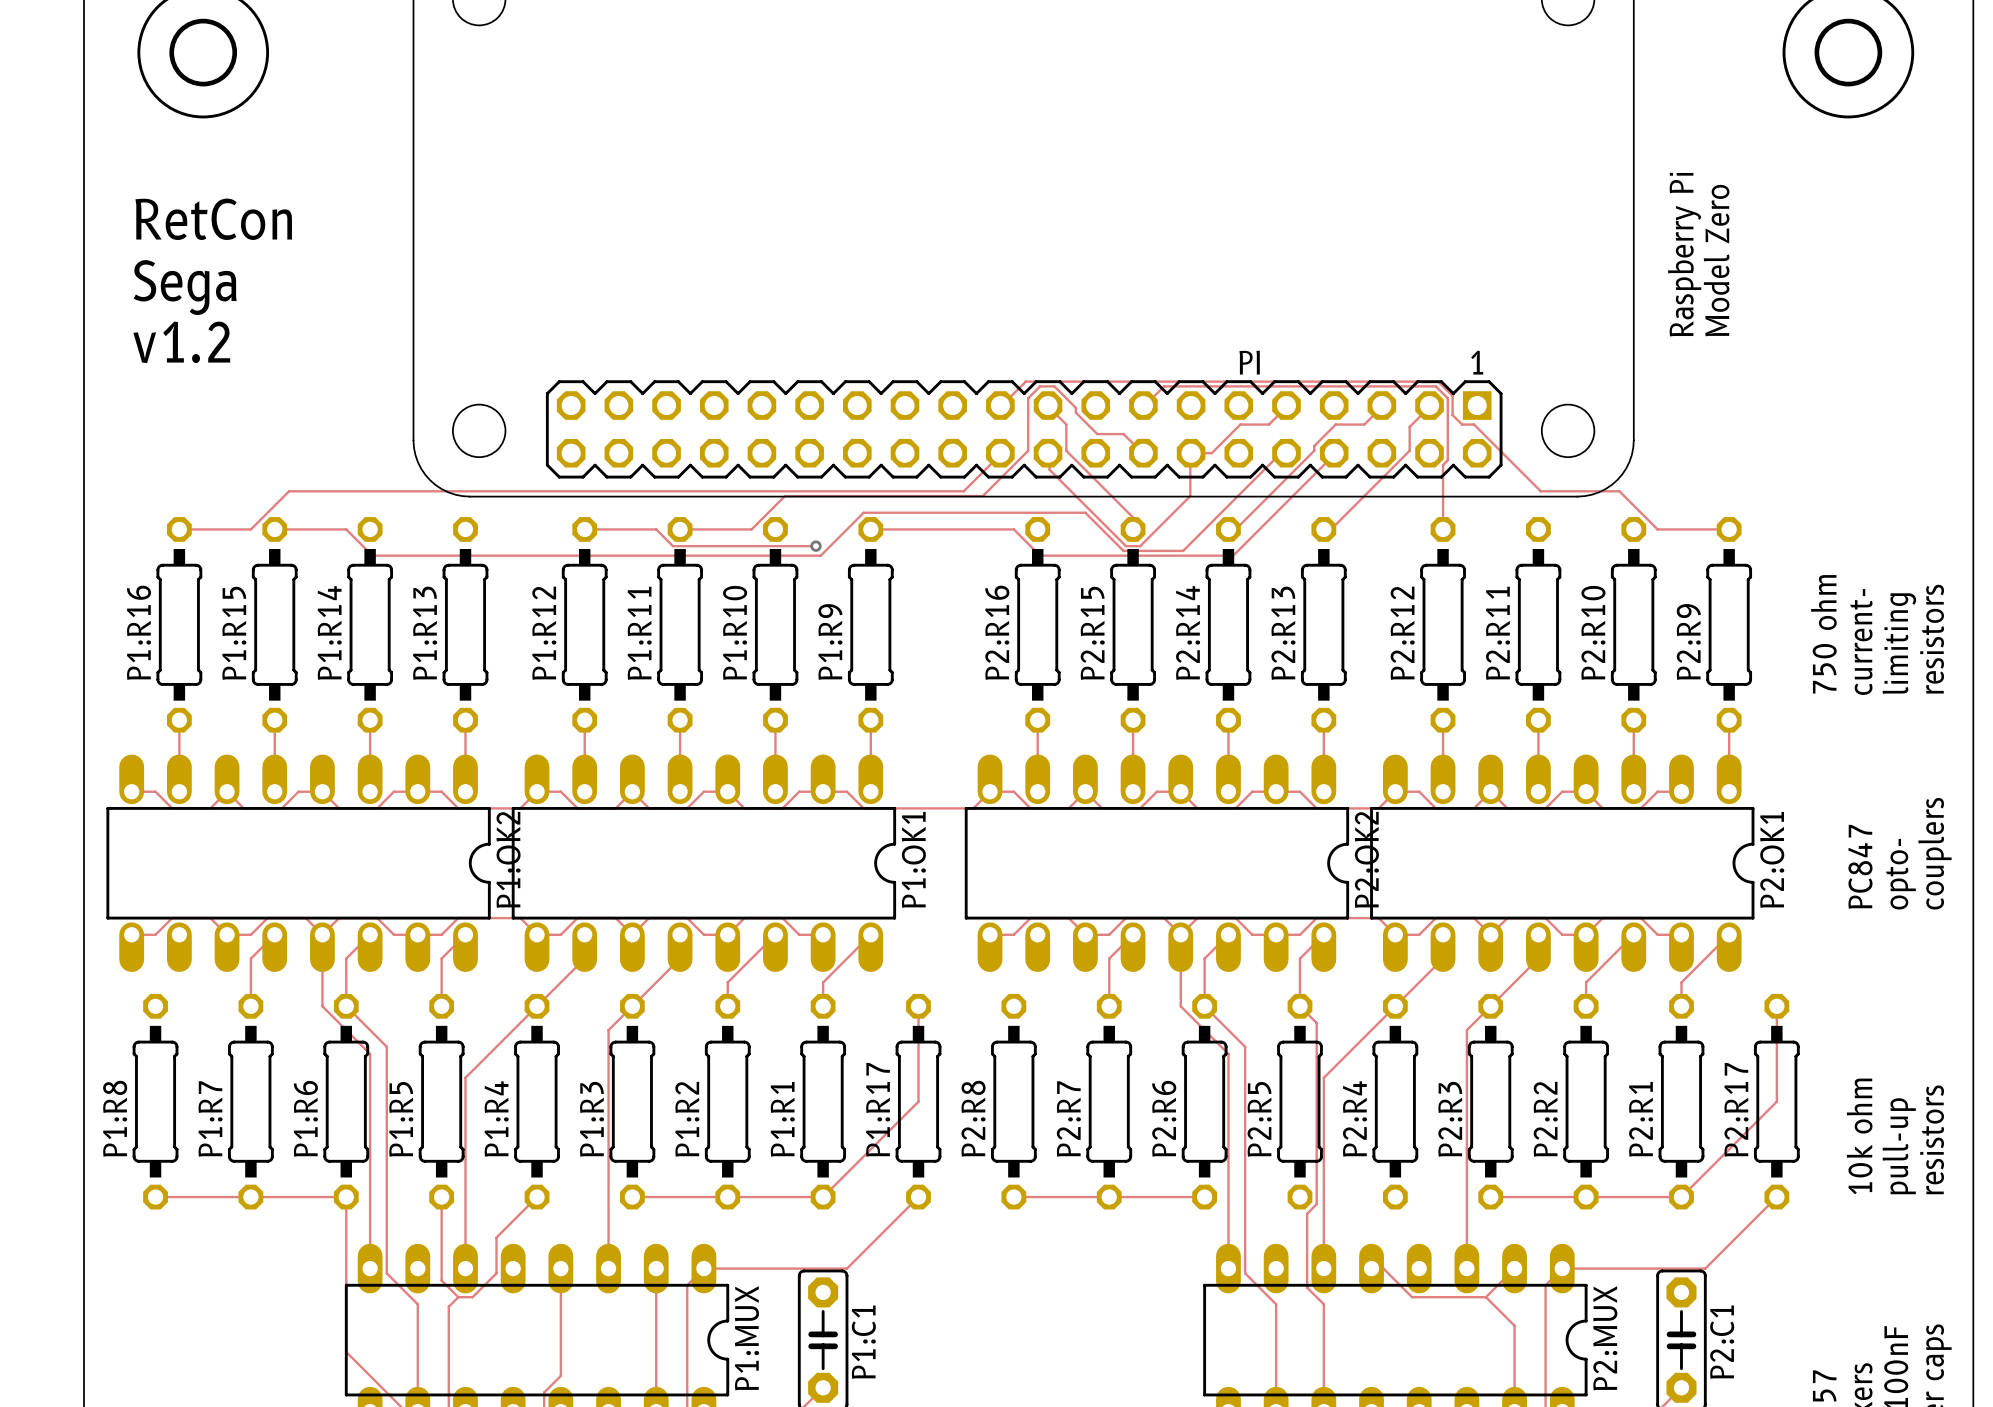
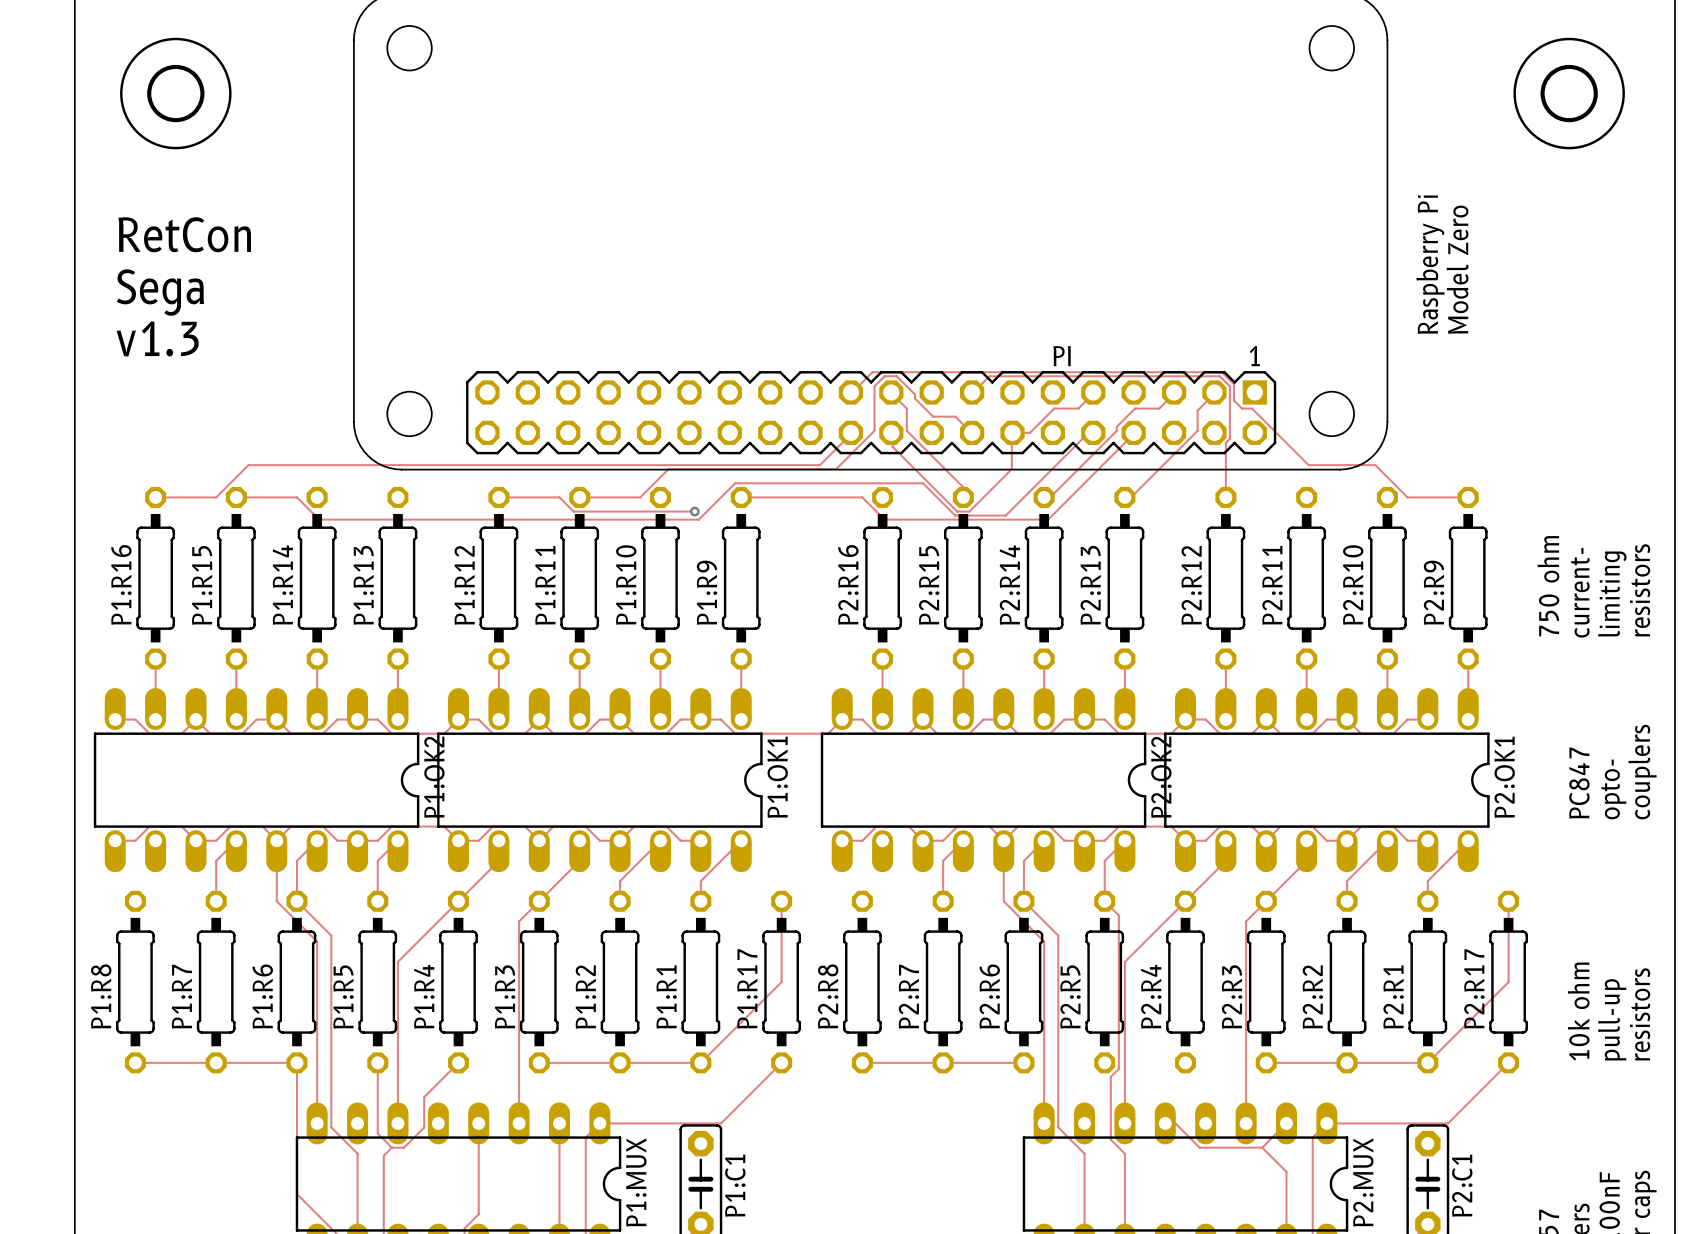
text: v1.2 (181, 342) -> v1.3 (157, 338)

